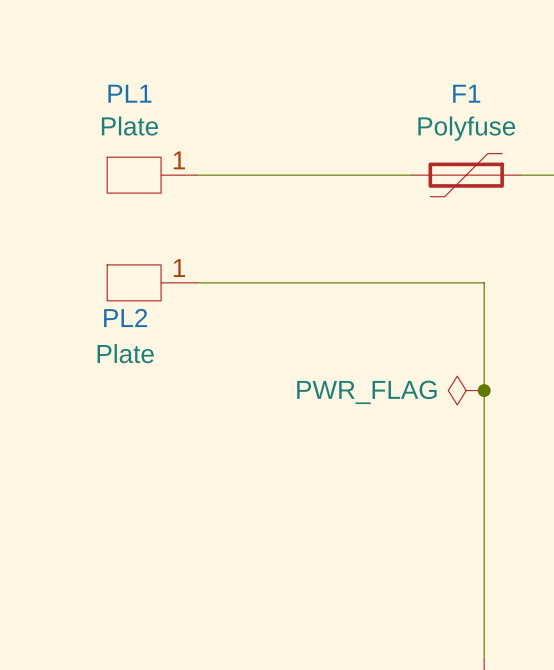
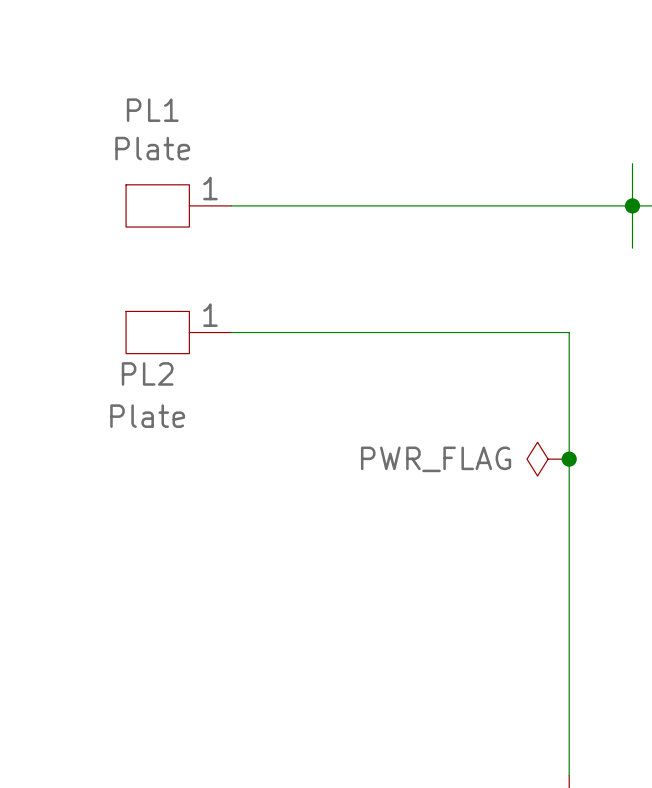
wire: none -> (632, 163) (632, 248)
F1: Polyfuse (466, 175) -> none
junction: none -> (632, 205)

